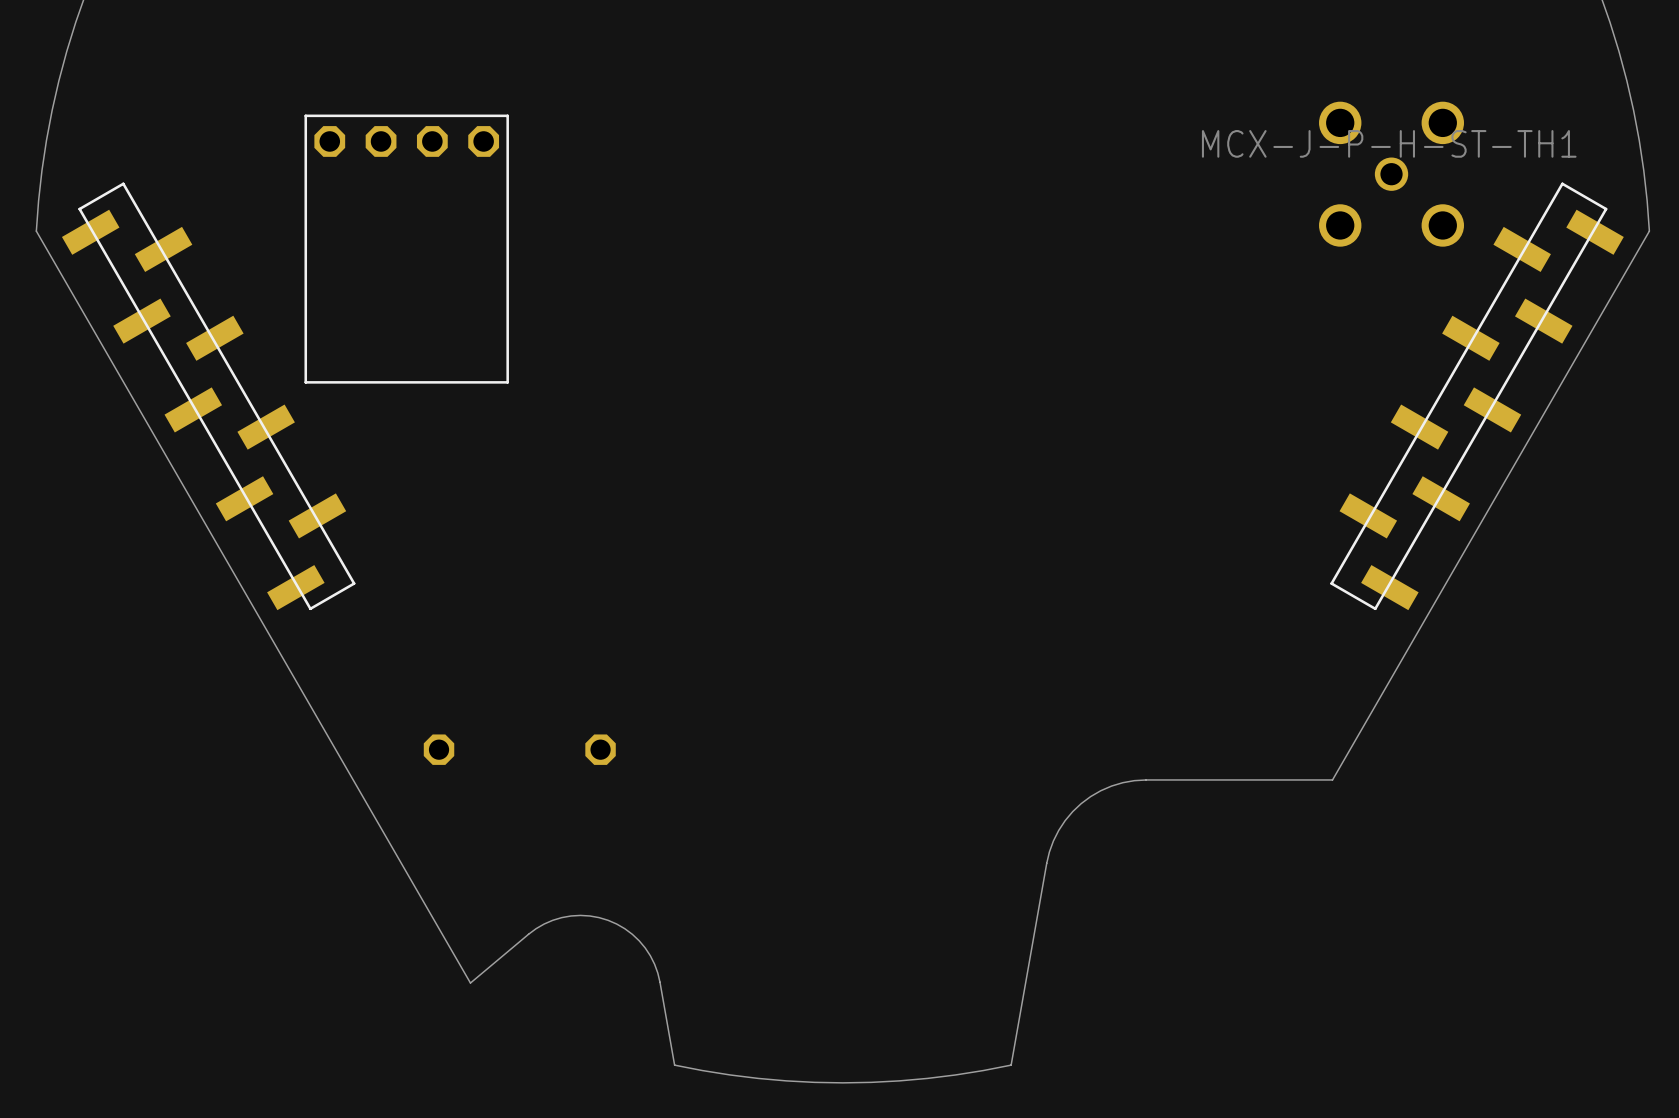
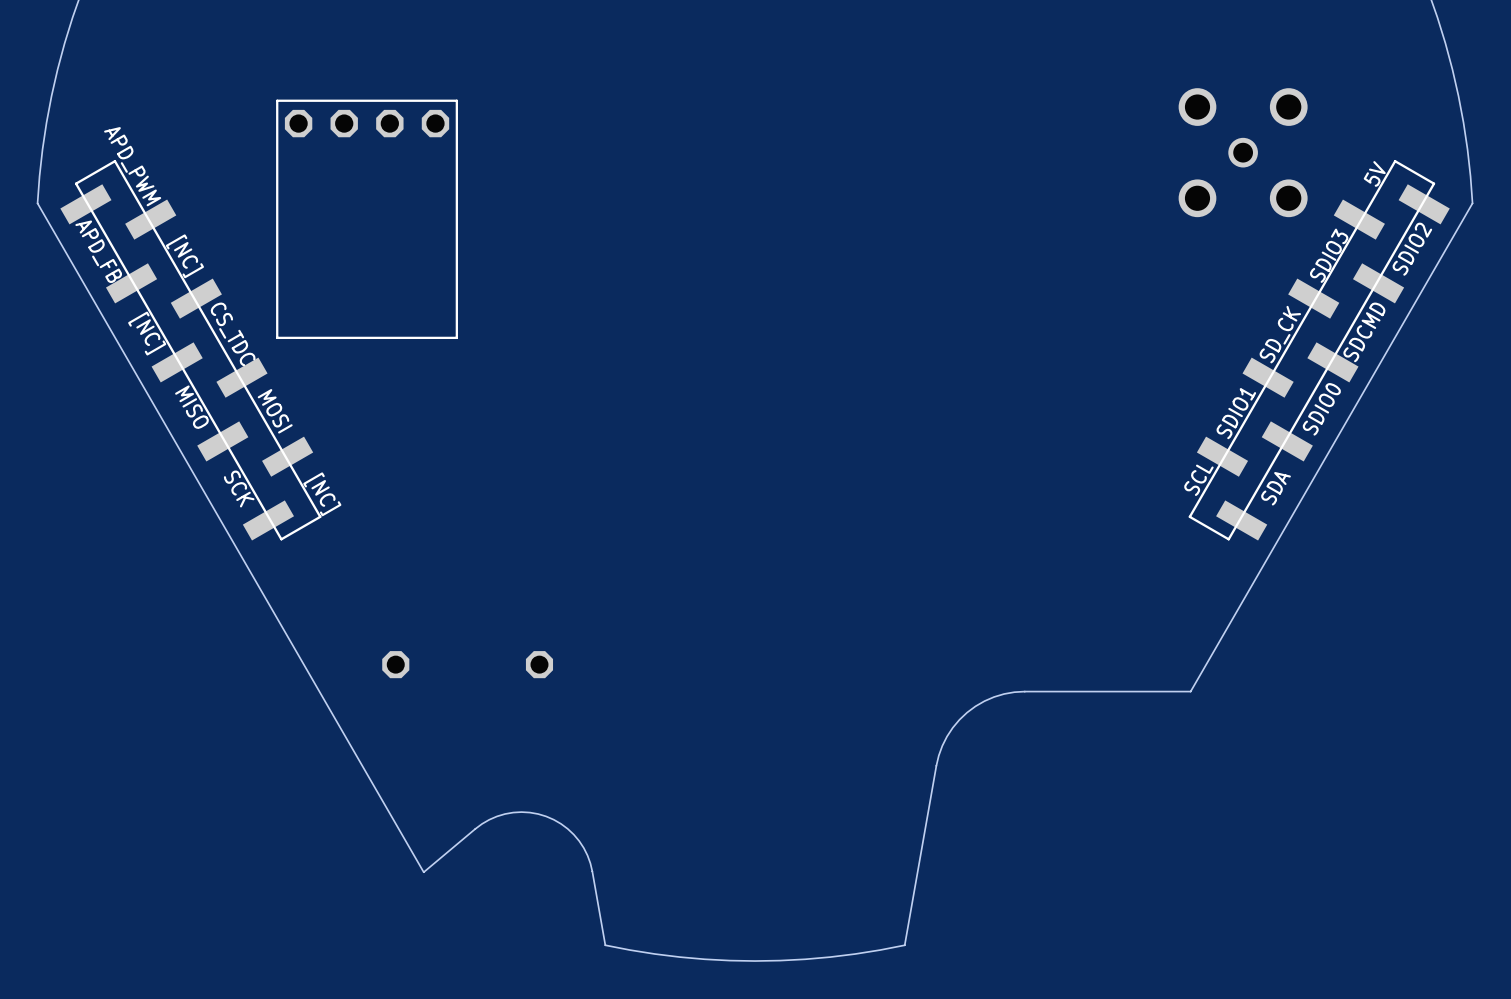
part value: MCX-J-P-H-ST-TH1 (1389, 143) -> none
text: none -> APD_PWM (132, 166)
text: none -> 5V (1374, 173)
text: none -> SDIO2 (1412, 249)
text: none -> APD_FB (98, 251)
text: none -> [NC] (184, 256)
text: none -> SDIO3 (1329, 255)
text: none -> SDСMD (1364, 332)
text: none -> [NC] (147, 333)
text: none -> CS_TDC (233, 334)
text: none -> SD_CK (1280, 334)
text: none -> MISO (191, 407)
text: none -> SDIO0 (1321, 409)
text: none -> MOSI (275, 411)
text: none -> SDIO1 (1236, 413)
text: none -> SCL (1198, 480)
text: none -> SDA (1276, 488)
text: none -> SCK (239, 488)
text: none -> [NC] (322, 494)

